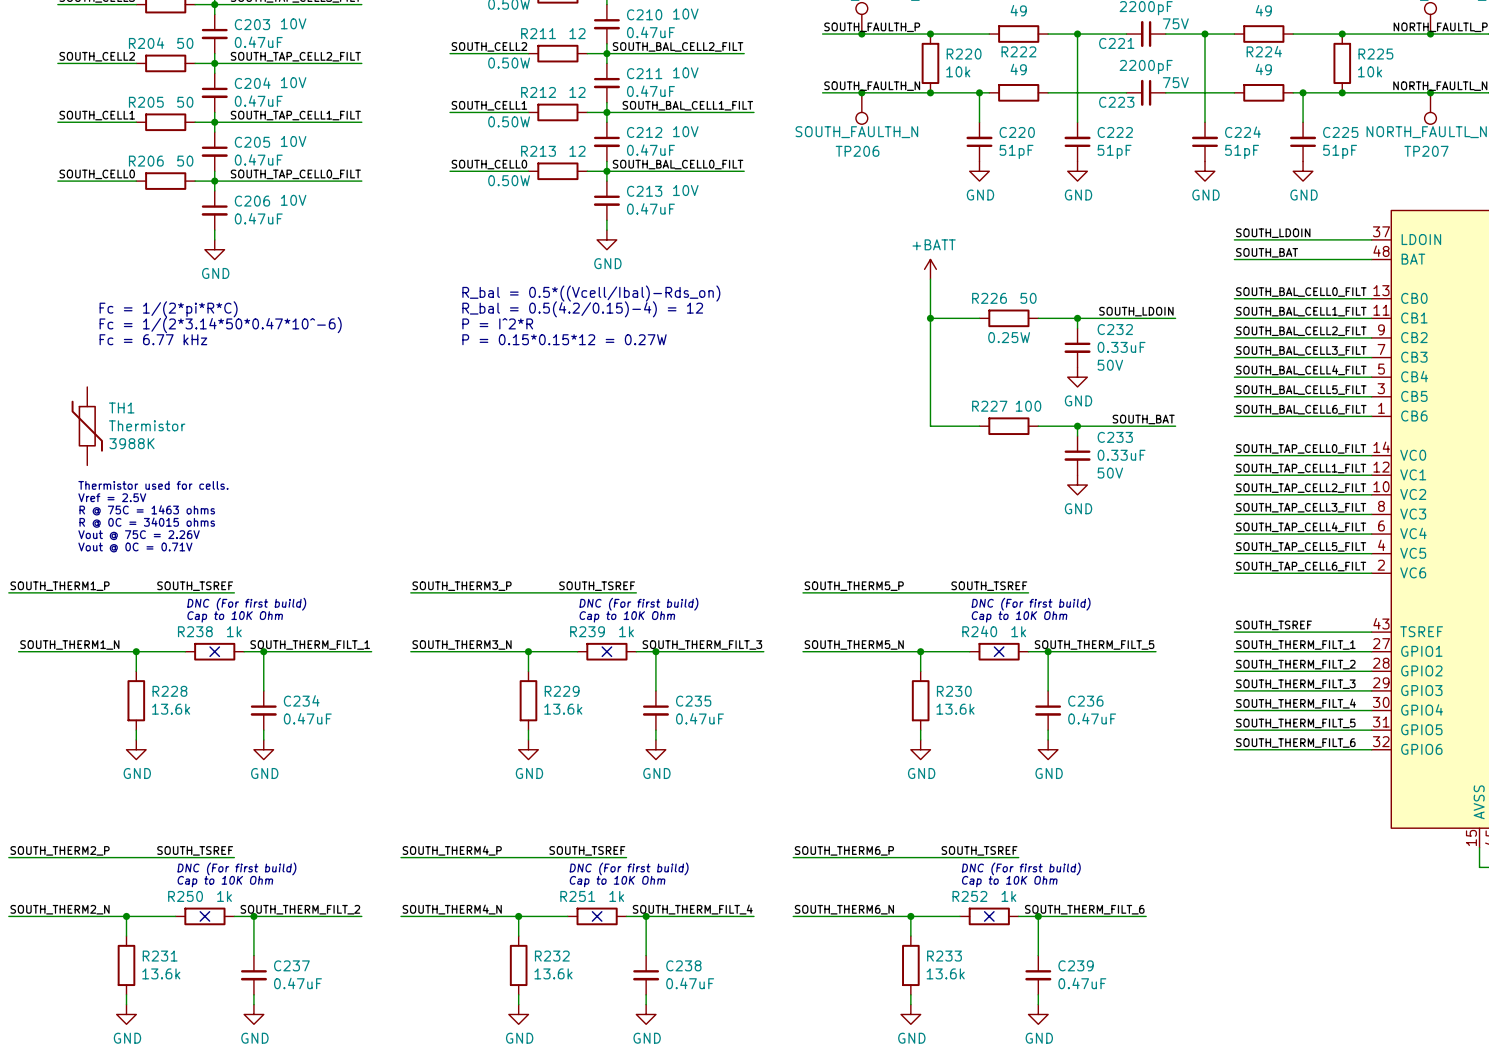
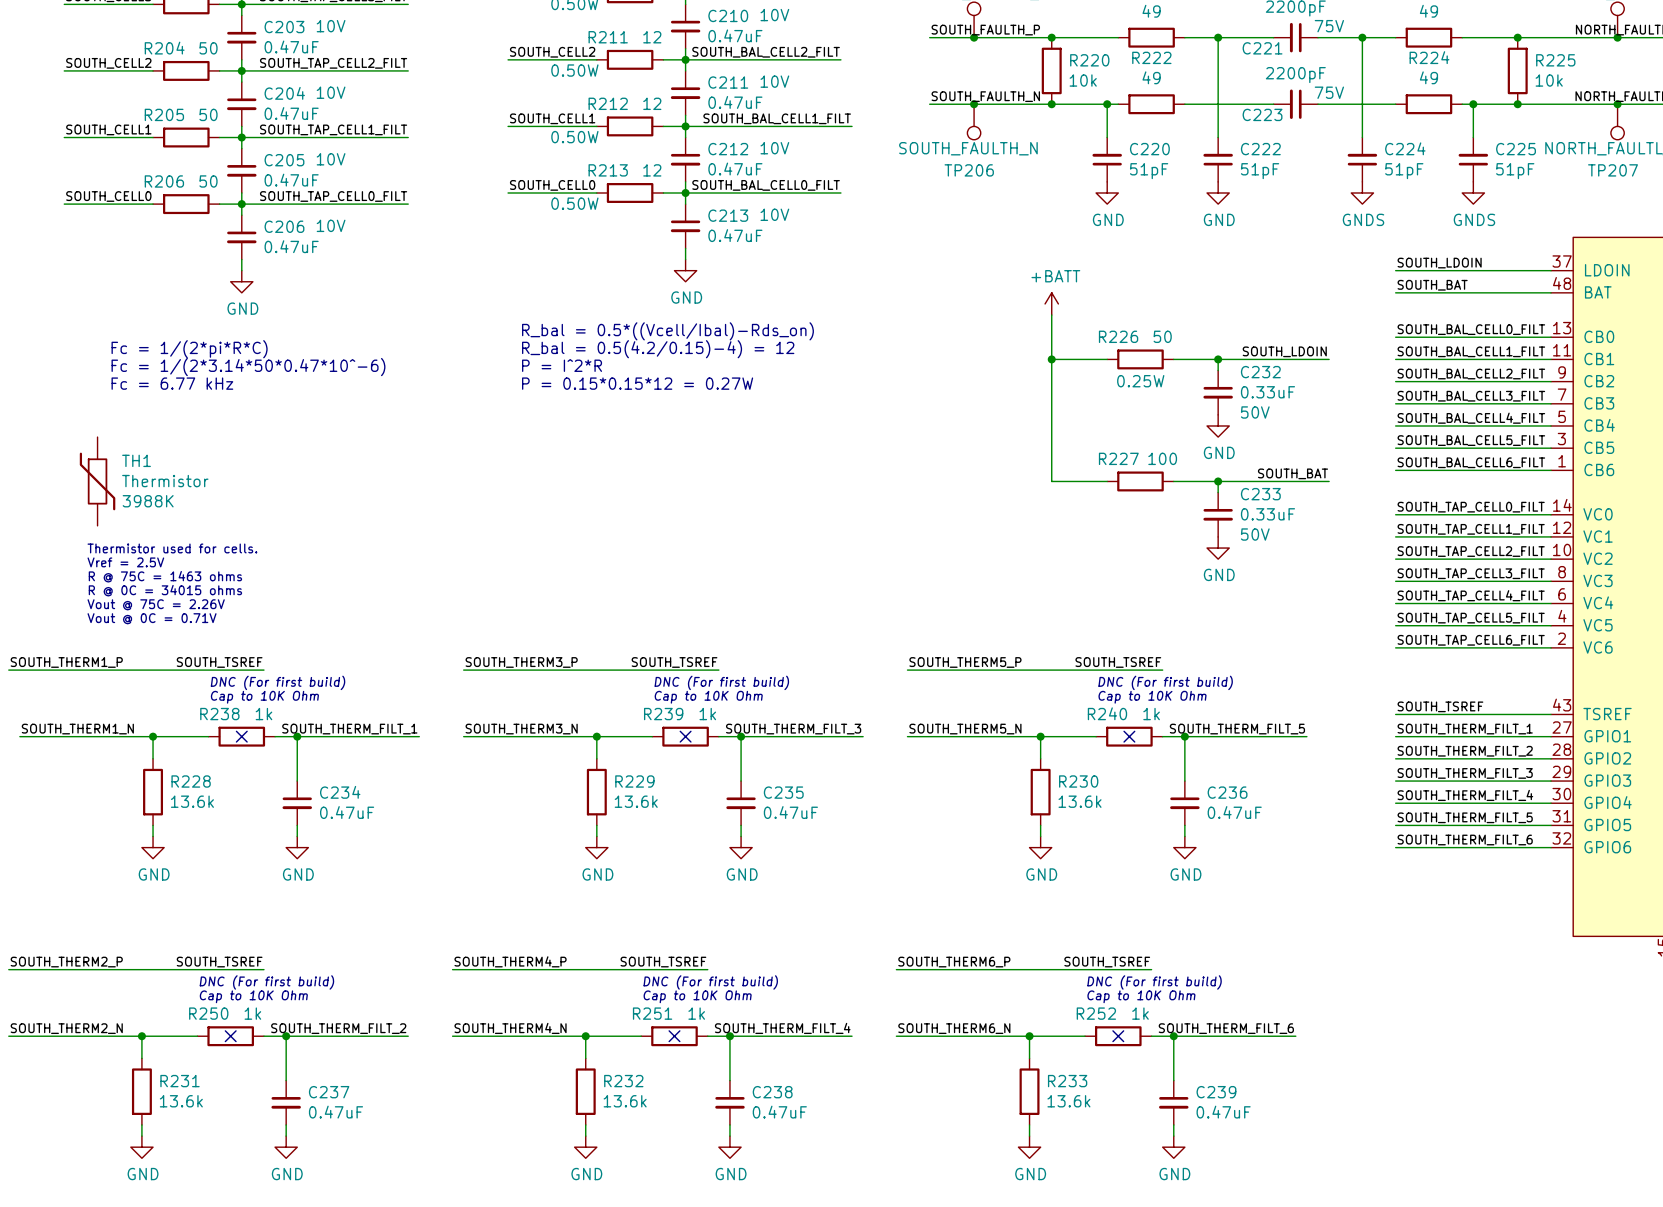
power symbol: GND (1204, 171) -> GNDS (1362, 192)
power symbol: GND (1303, 171) -> GNDS (1473, 192)

